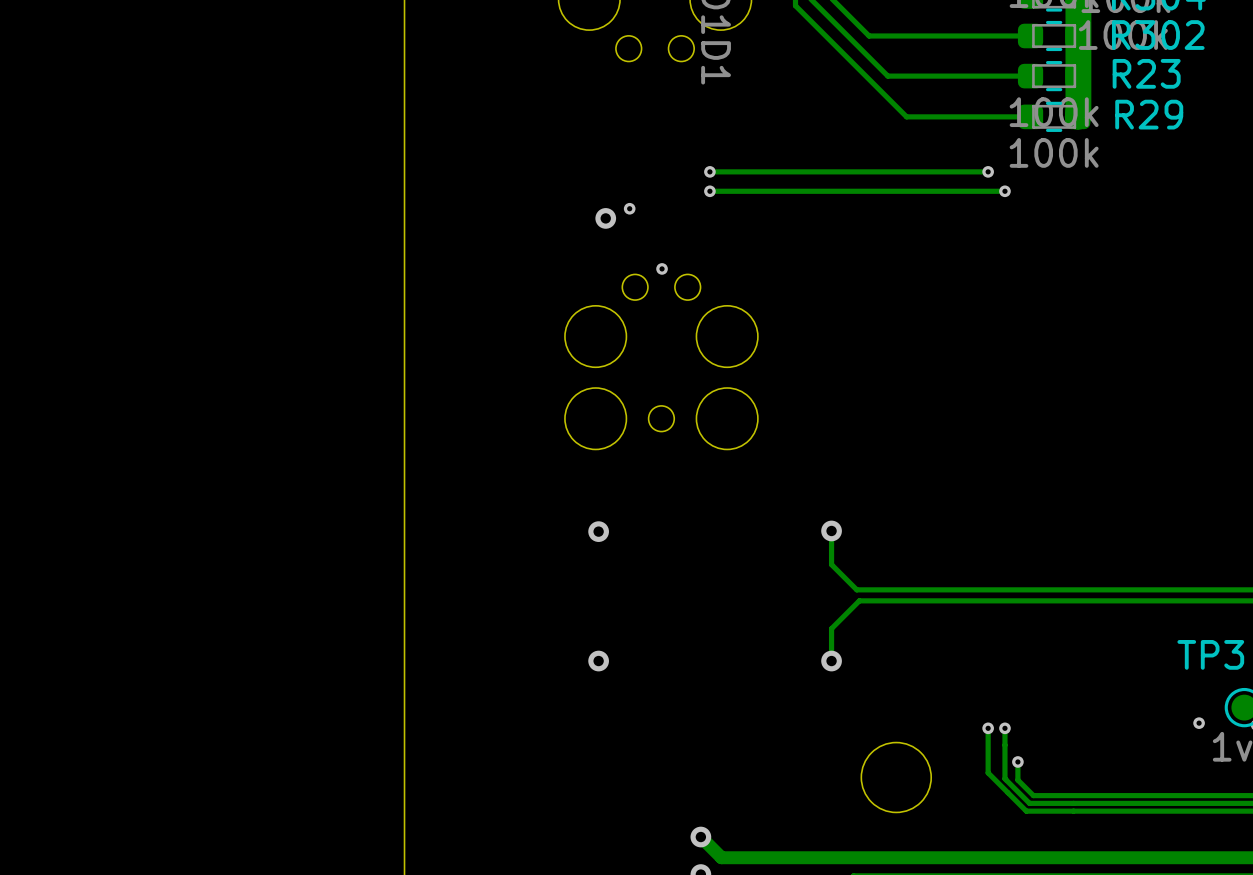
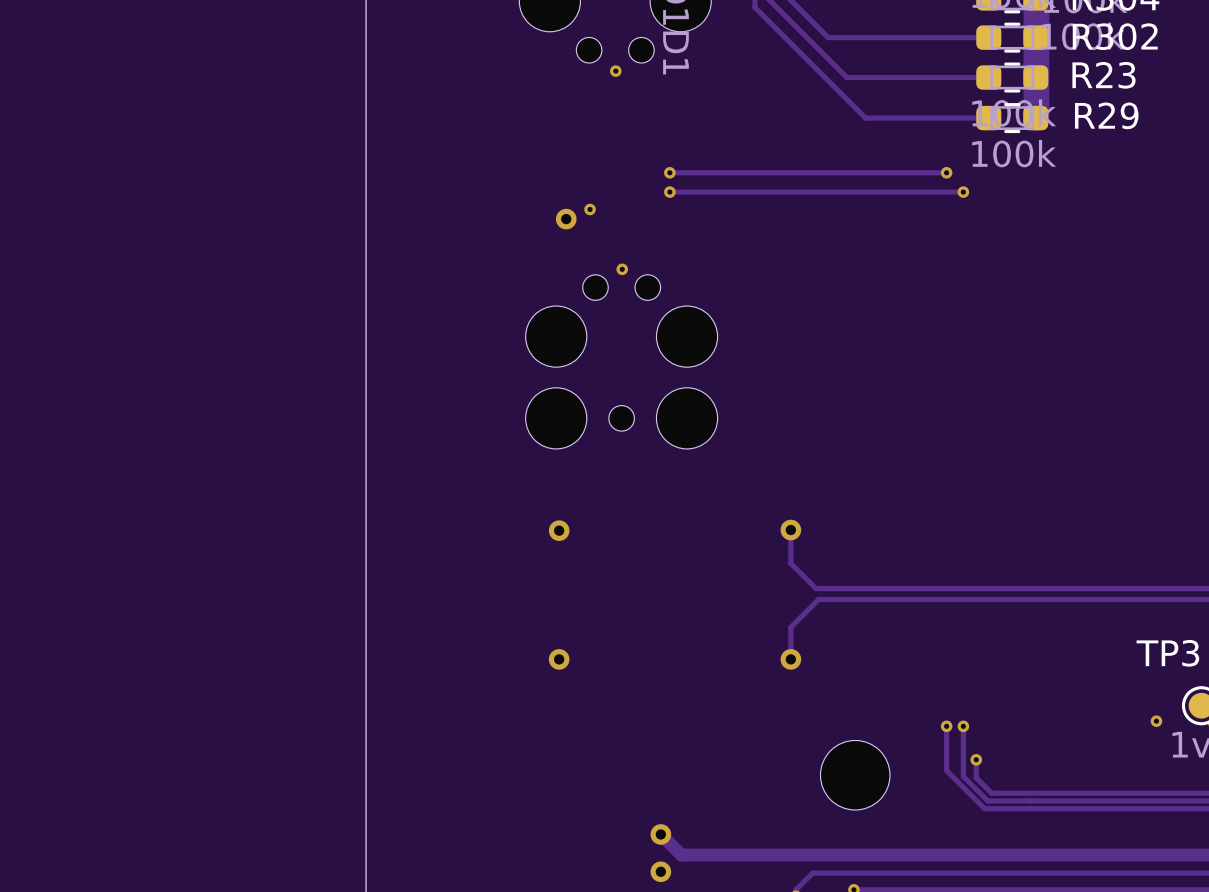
via: none -> (615, 71)

